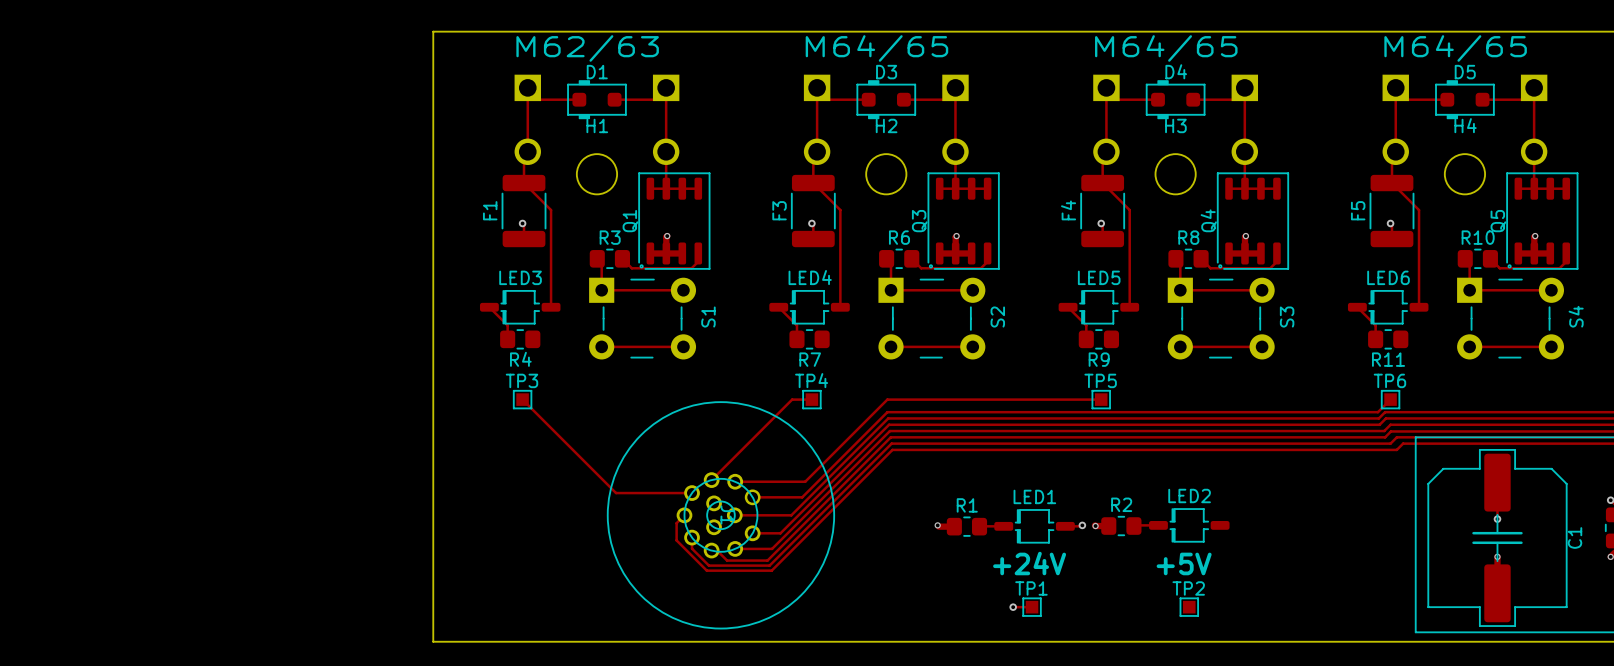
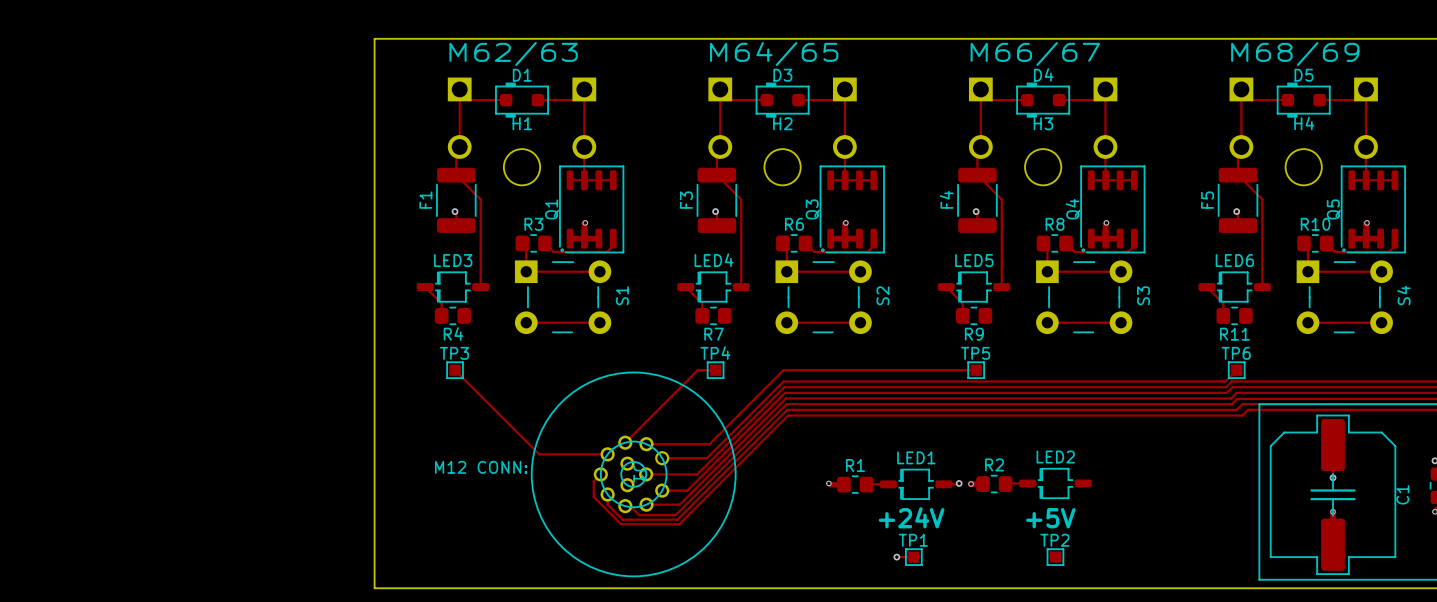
text: M64/65 (1166, 48) -> M66/67 (1035, 53)
text: M64/65 (1455, 48) -> M68/69 (1295, 53)
text: none -> M12 CONN: (481, 467)

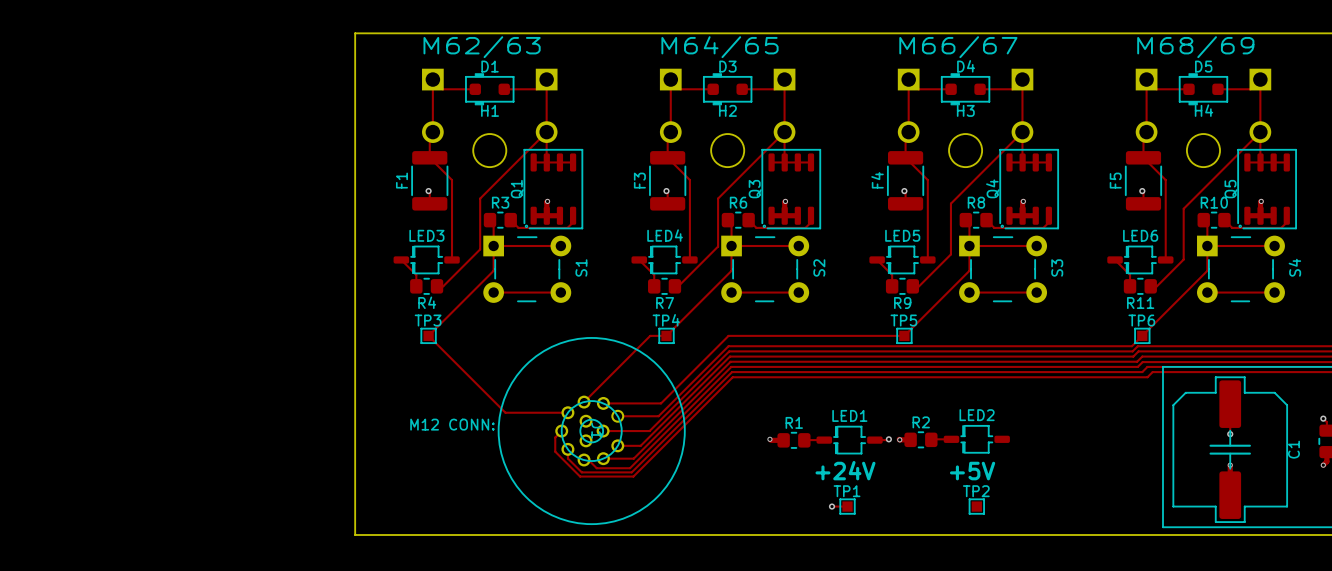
top track: none -> (546, 132) (480, 198) (480, 249) (443, 286) (437, 286)
top track: none -> (784, 132) (718, 198) (718, 246) (678, 286) (674, 286)
top track: none -> (1022, 132) (950, 203) (950, 254) (919, 286) (912, 286)
top track: none -> (1260, 132) (1183, 208) (1183, 259) (1156, 286) (1150, 286)
top track: none -> (493, 245) (493, 270) (428, 335)
top track: none -> (731, 245) (731, 270) (666, 335)
top track: none -> (969, 245) (969, 270) (904, 335)
top track: none -> (1207, 245) (1207, 270) (1142, 335)

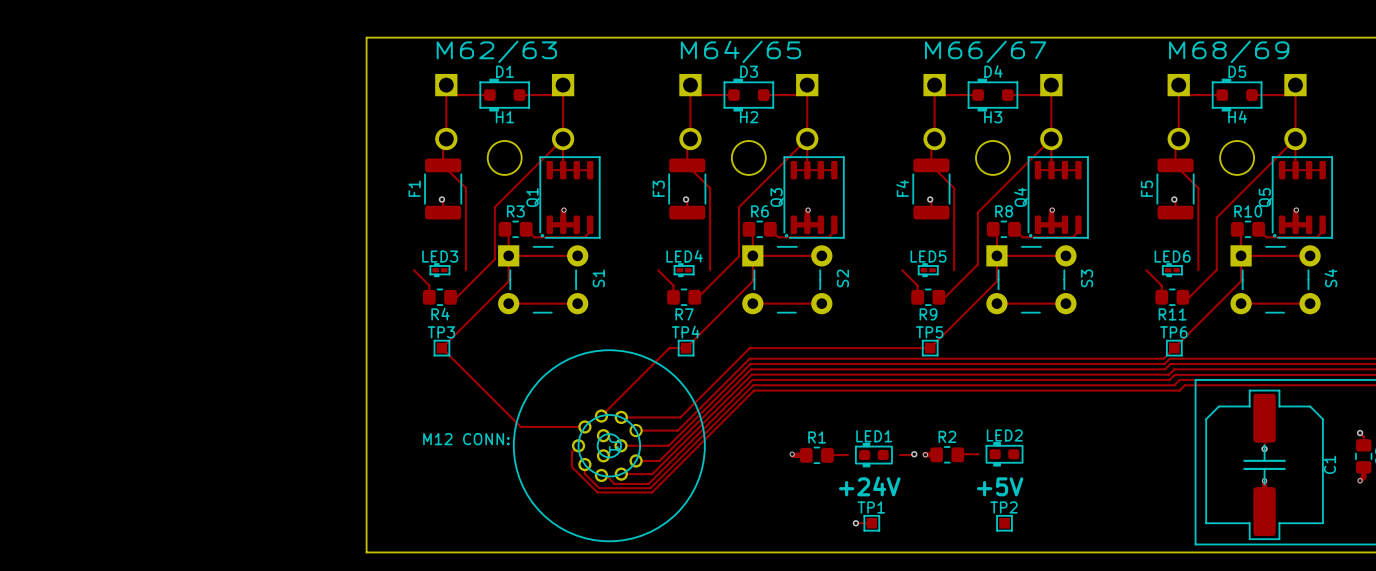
LED3 footprint: [393, 245, 460, 275] -> [429, 263, 451, 278]
LED4 footprint: [631, 245, 698, 275] -> [673, 263, 695, 278]
LED5 footprint: [869, 245, 936, 275] -> [918, 263, 939, 278]
LED6 footprint: [1107, 245, 1174, 275] -> [1162, 263, 1183, 278]
LED2 footprint: [943, 425, 1010, 454] -> [985, 441, 1024, 467]
LED1 footprint: [816, 426, 883, 455] -> [855, 442, 893, 468]

